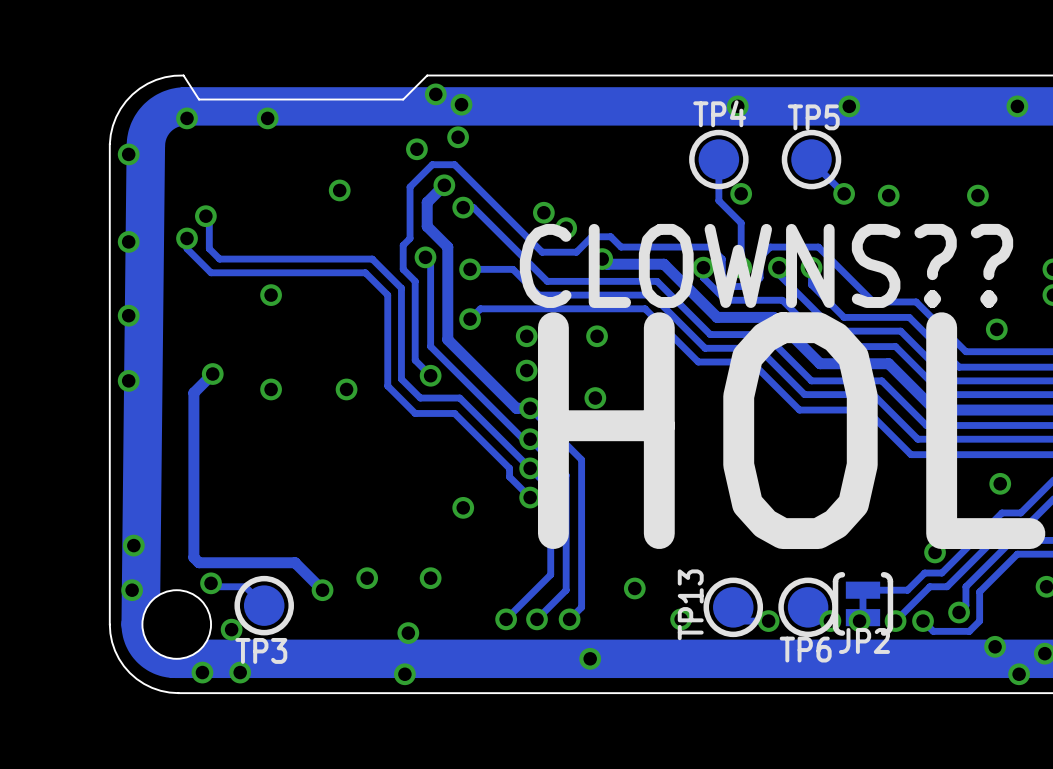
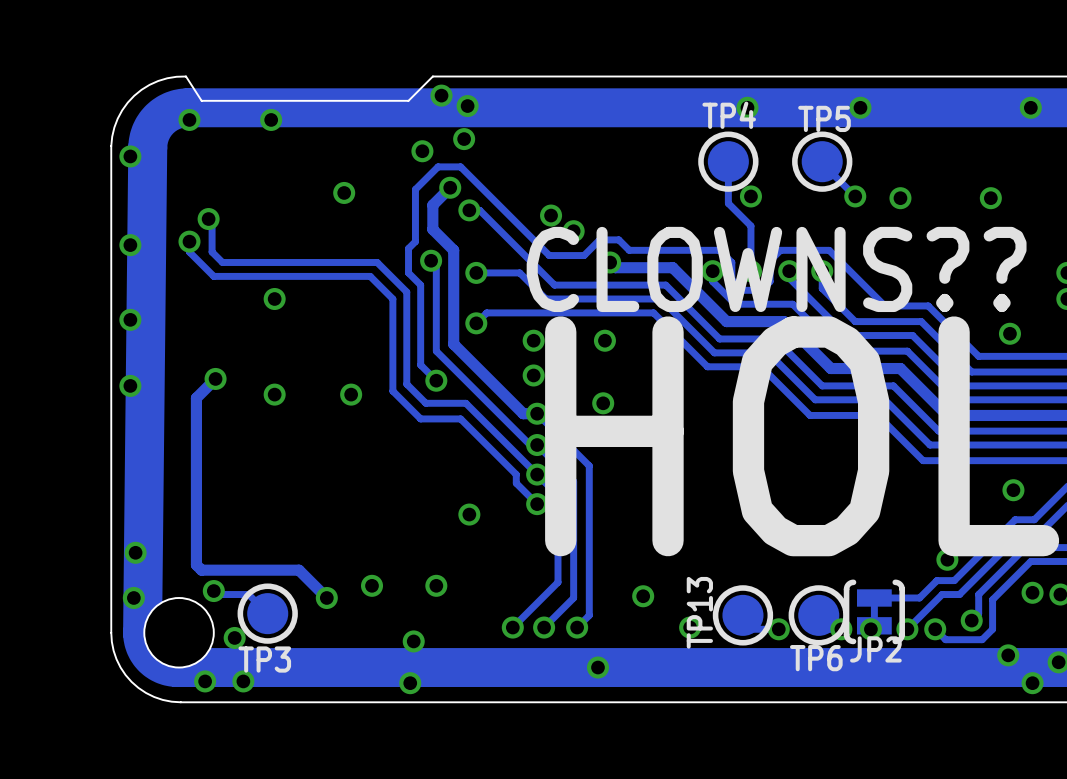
via: none -> (1032, 592)

